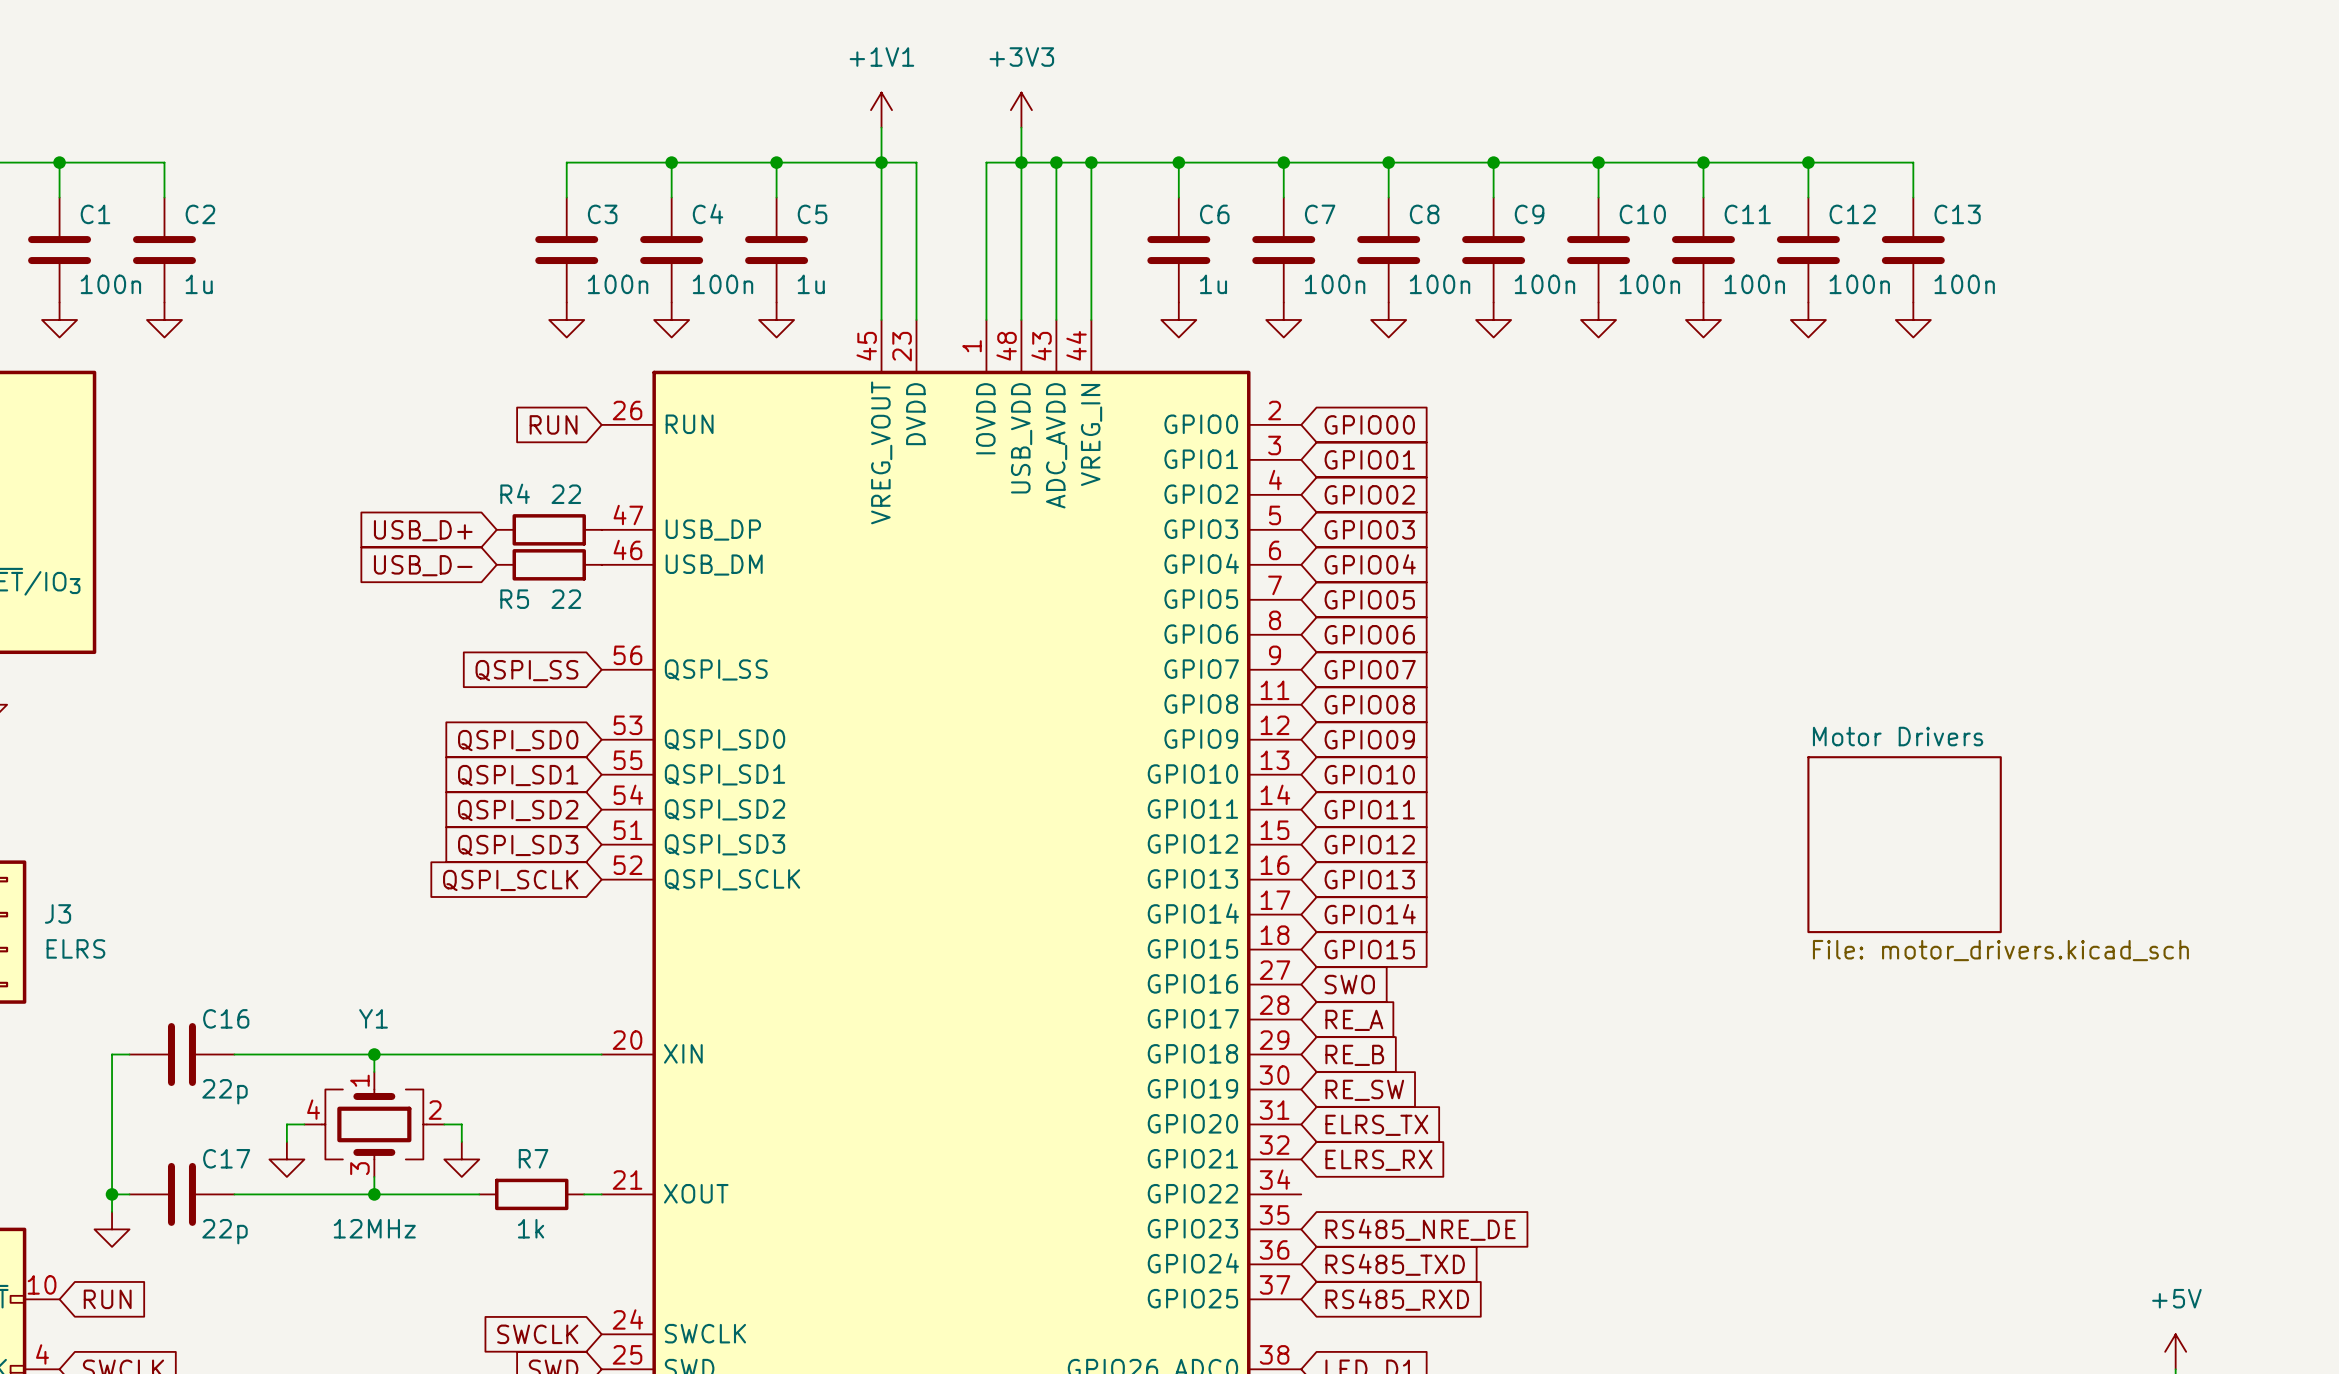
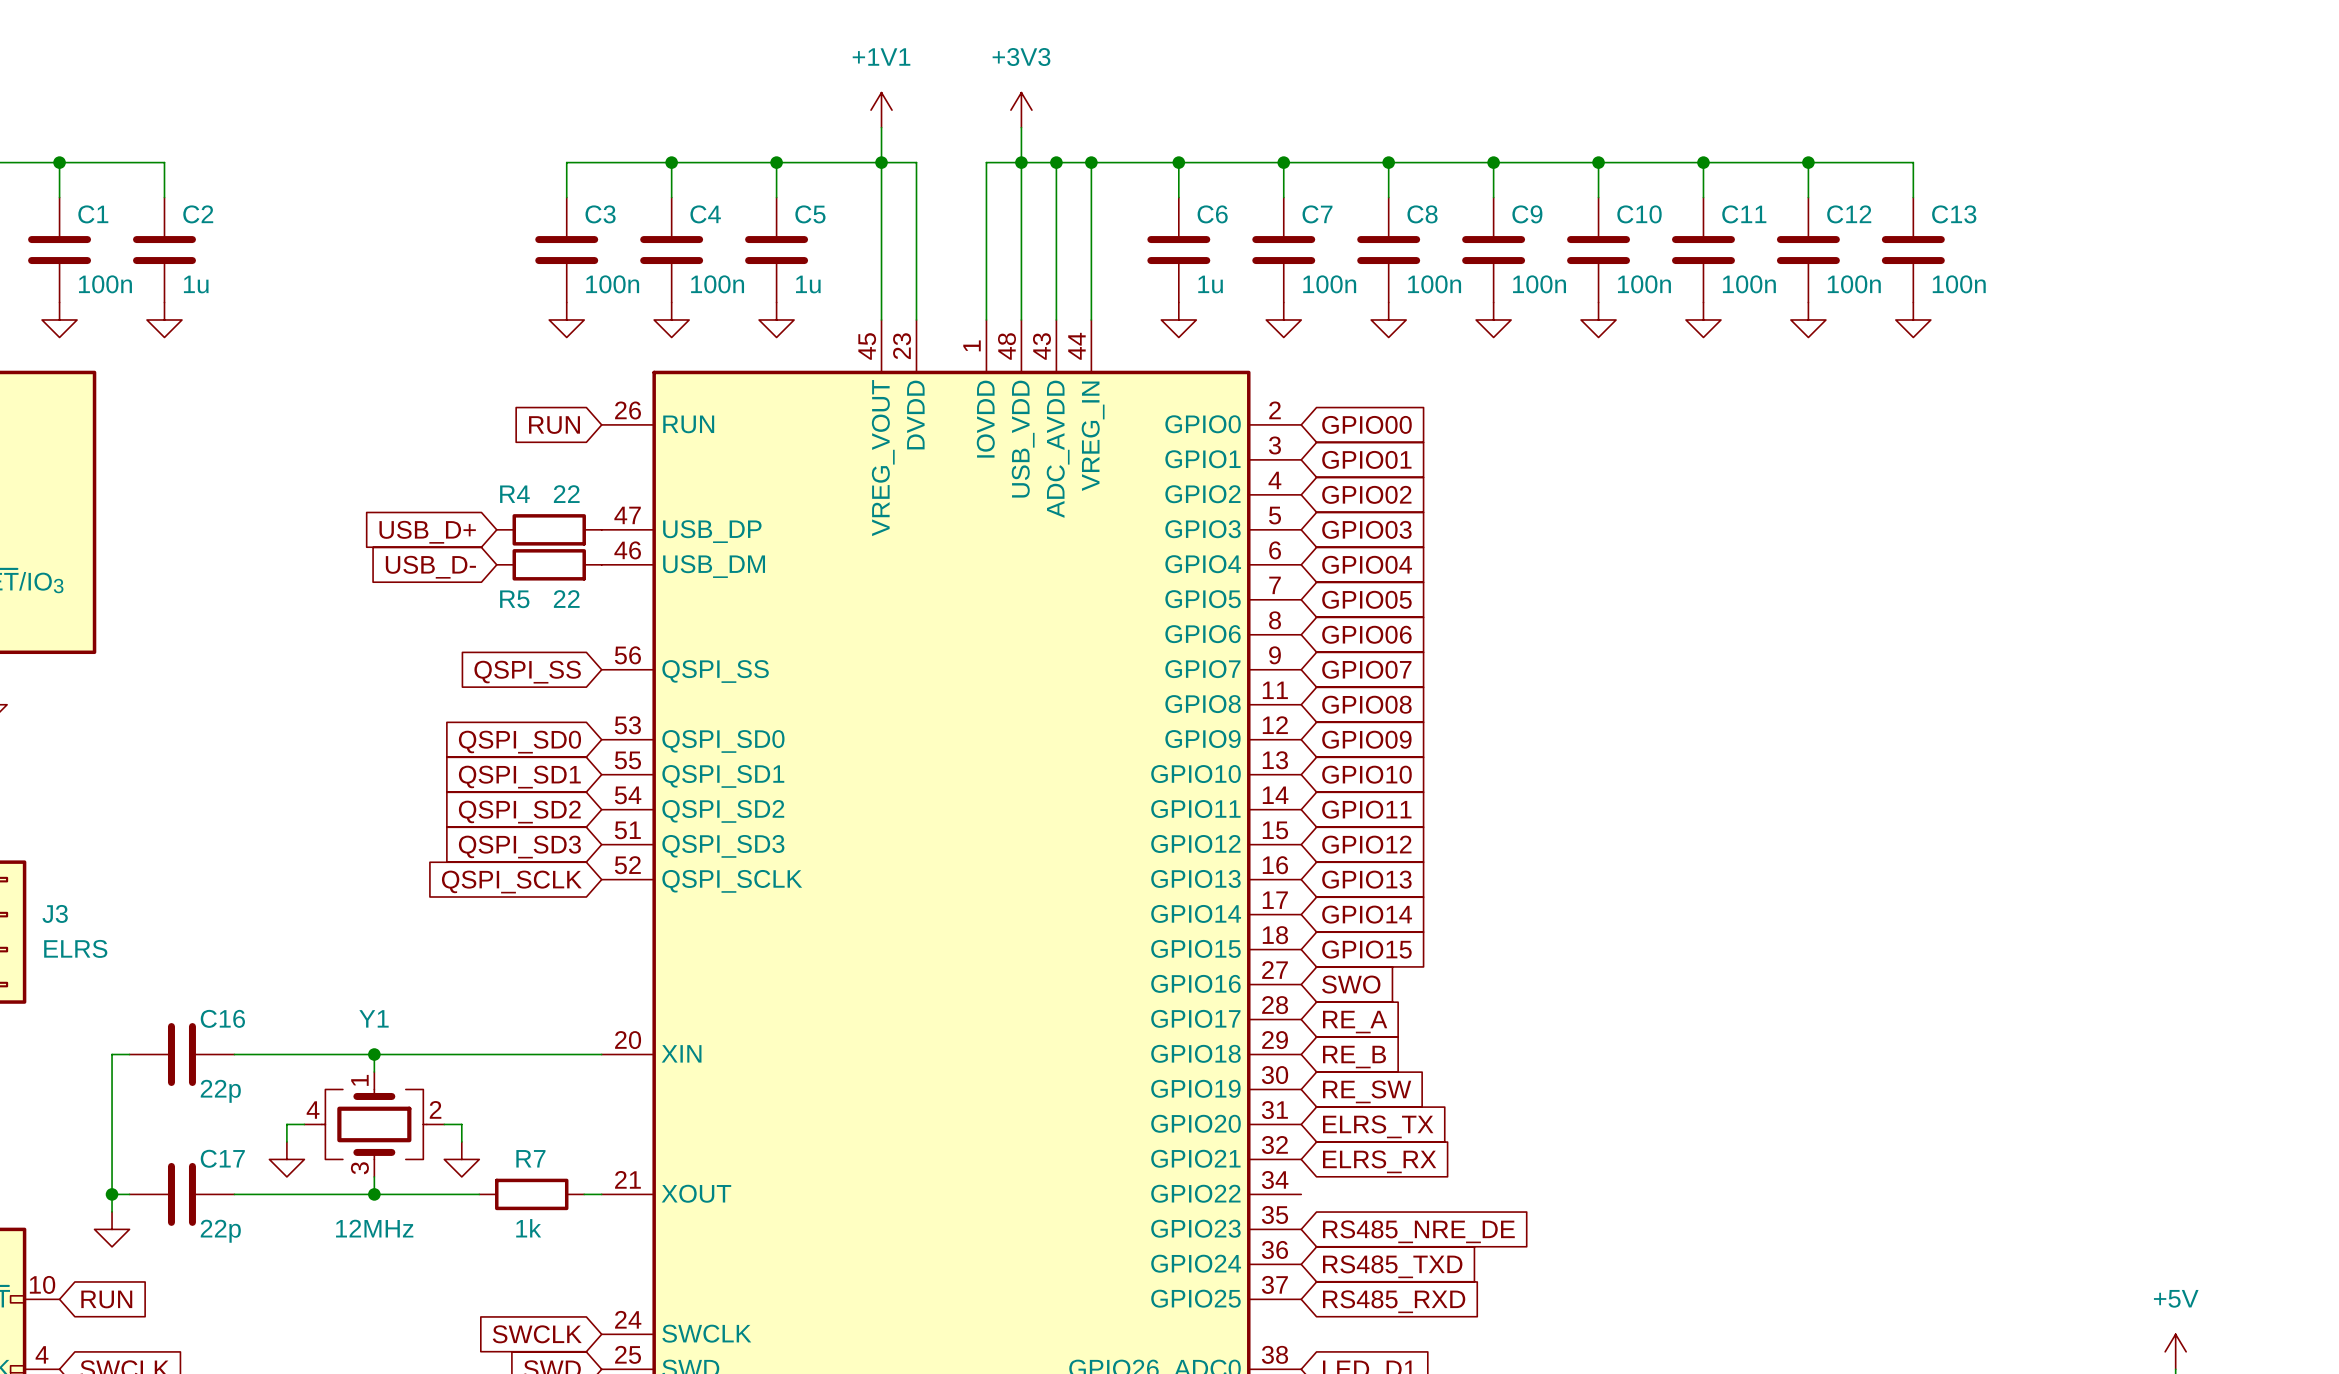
sheet Motor Drivers: File: motor_drivers.kicad_sch (1904, 844) -> none

